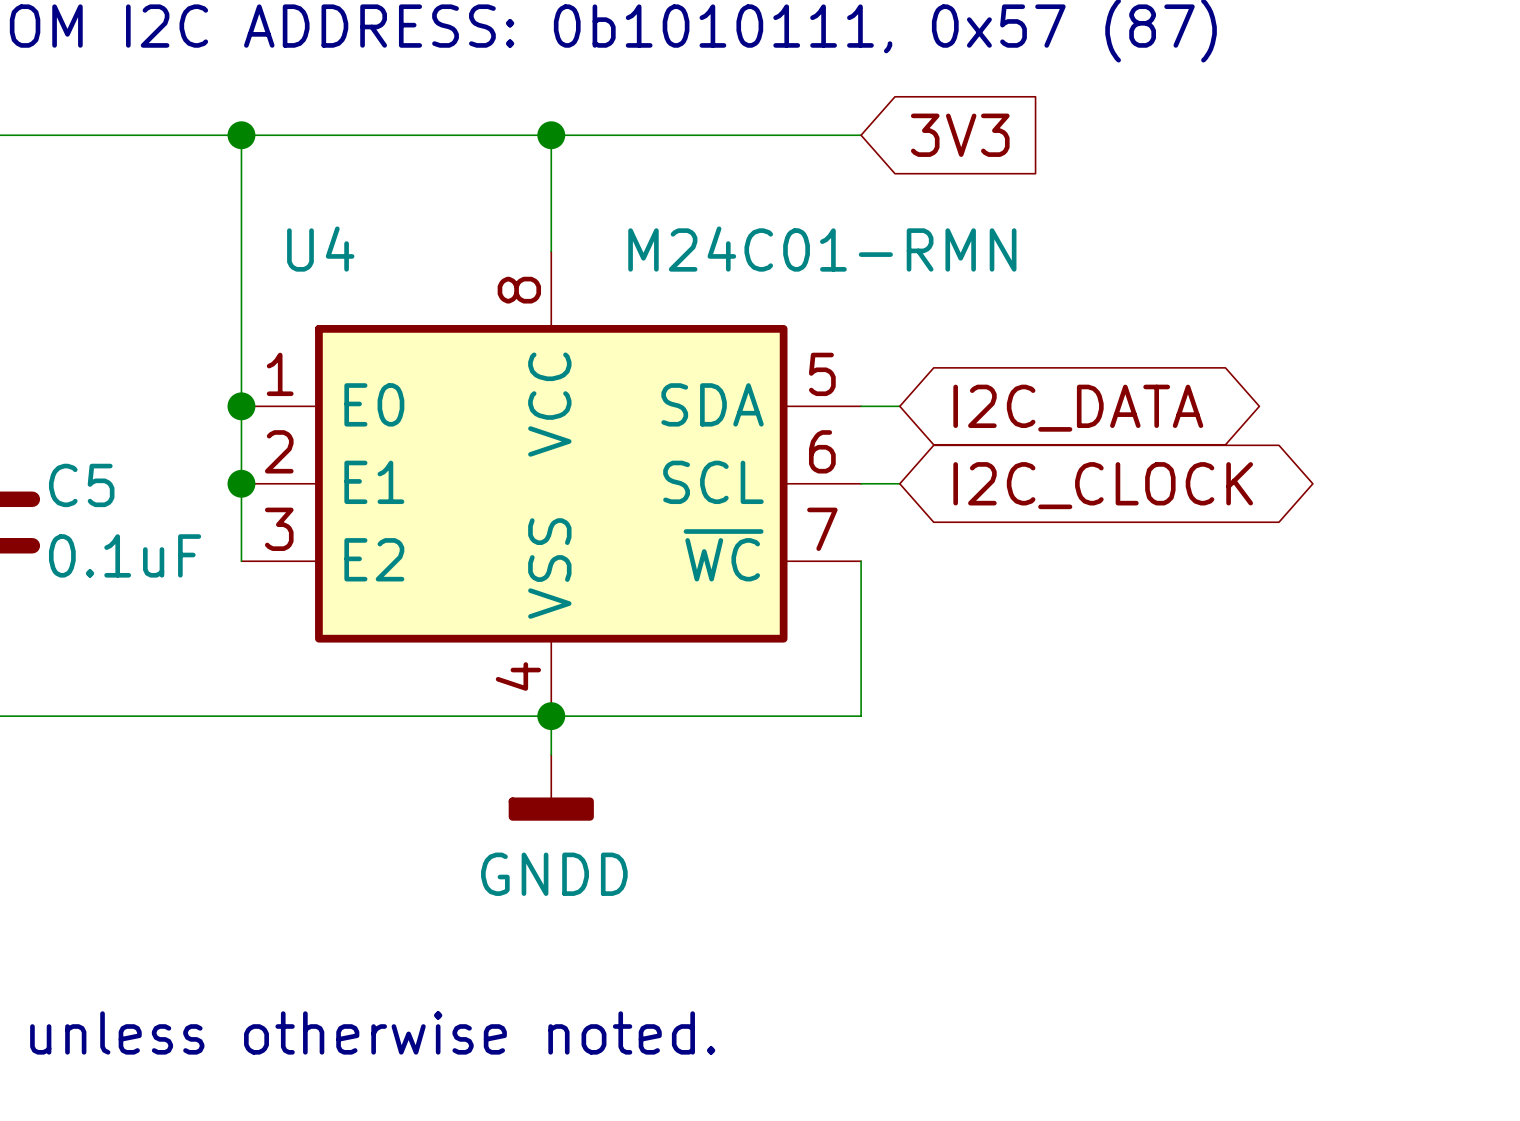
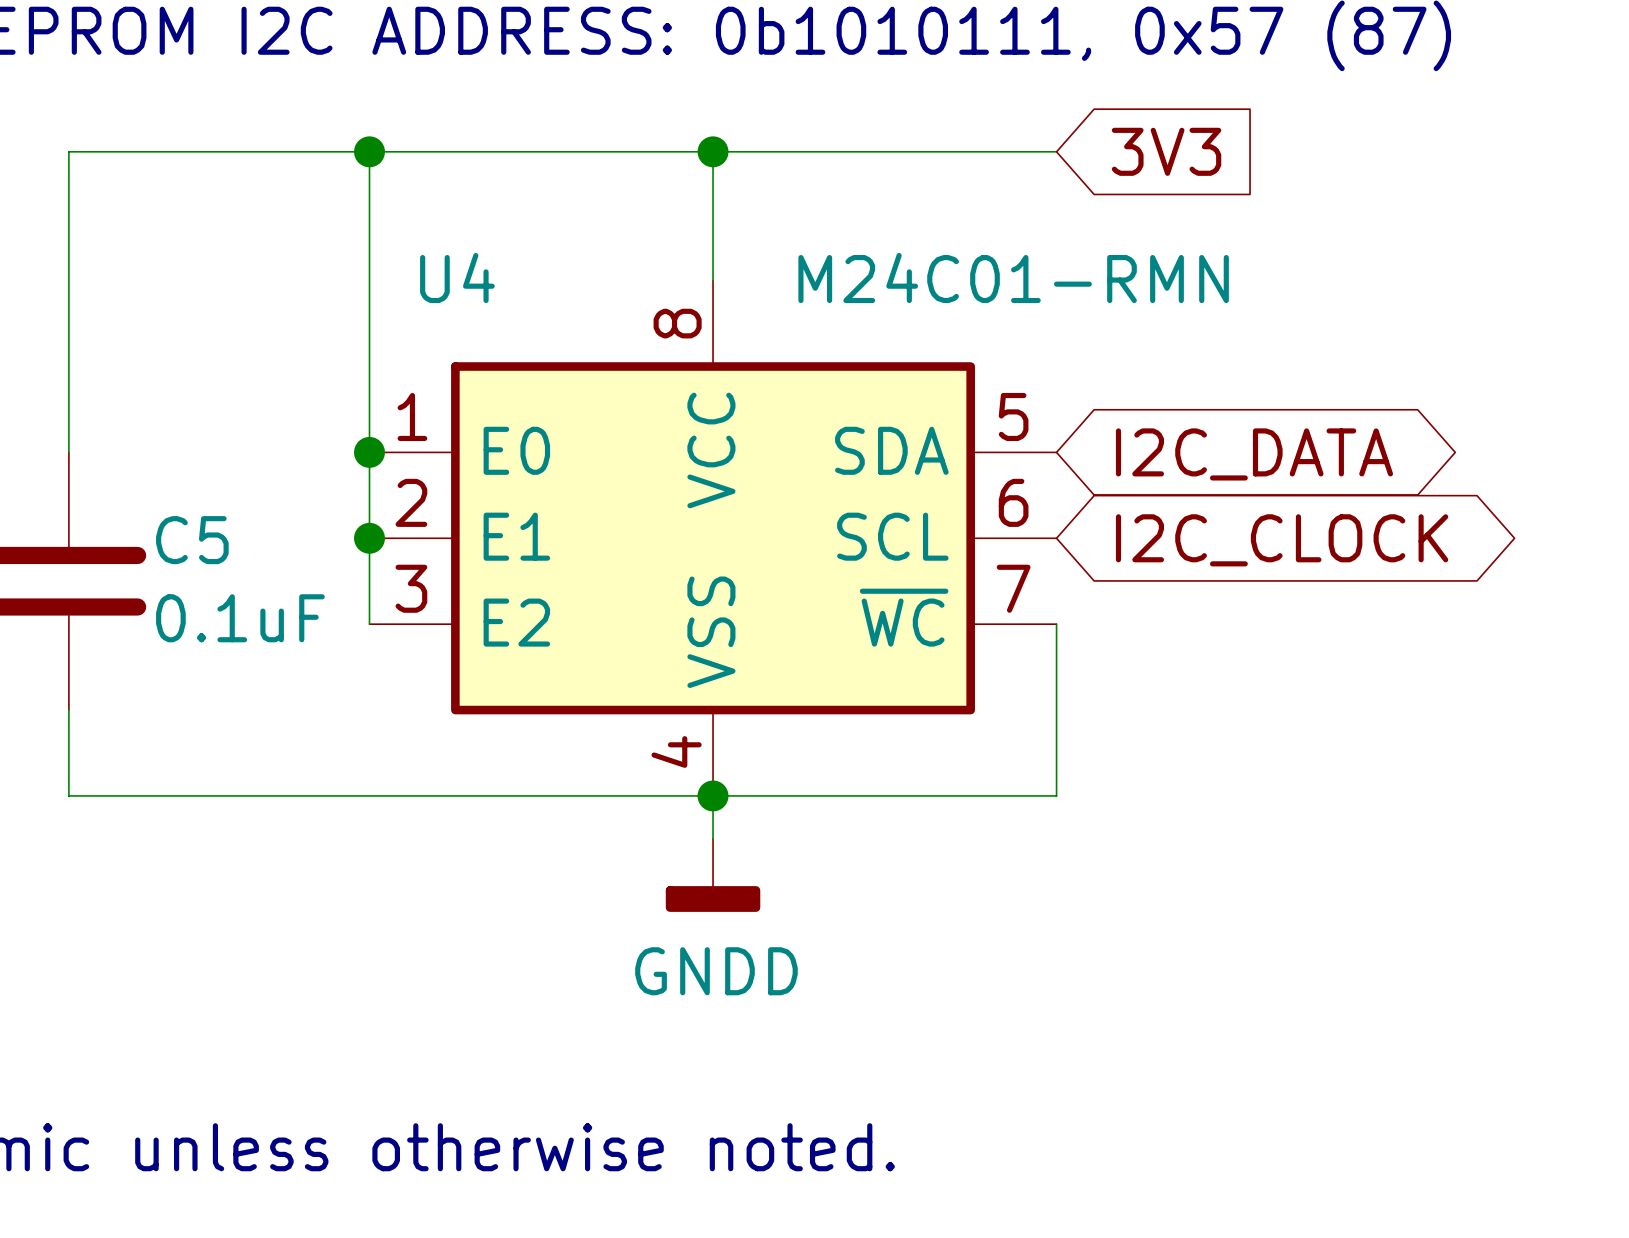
wire: (861, 406) (899, 406) -> none
global label position: I2C_DATA (1078, 408) -> I2C_DATA (1254, 454)
wire: (861, 483) (899, 483) -> none
global label position: I2C_CLOCK (1103, 485) -> I2C_CLOCK (1282, 540)

